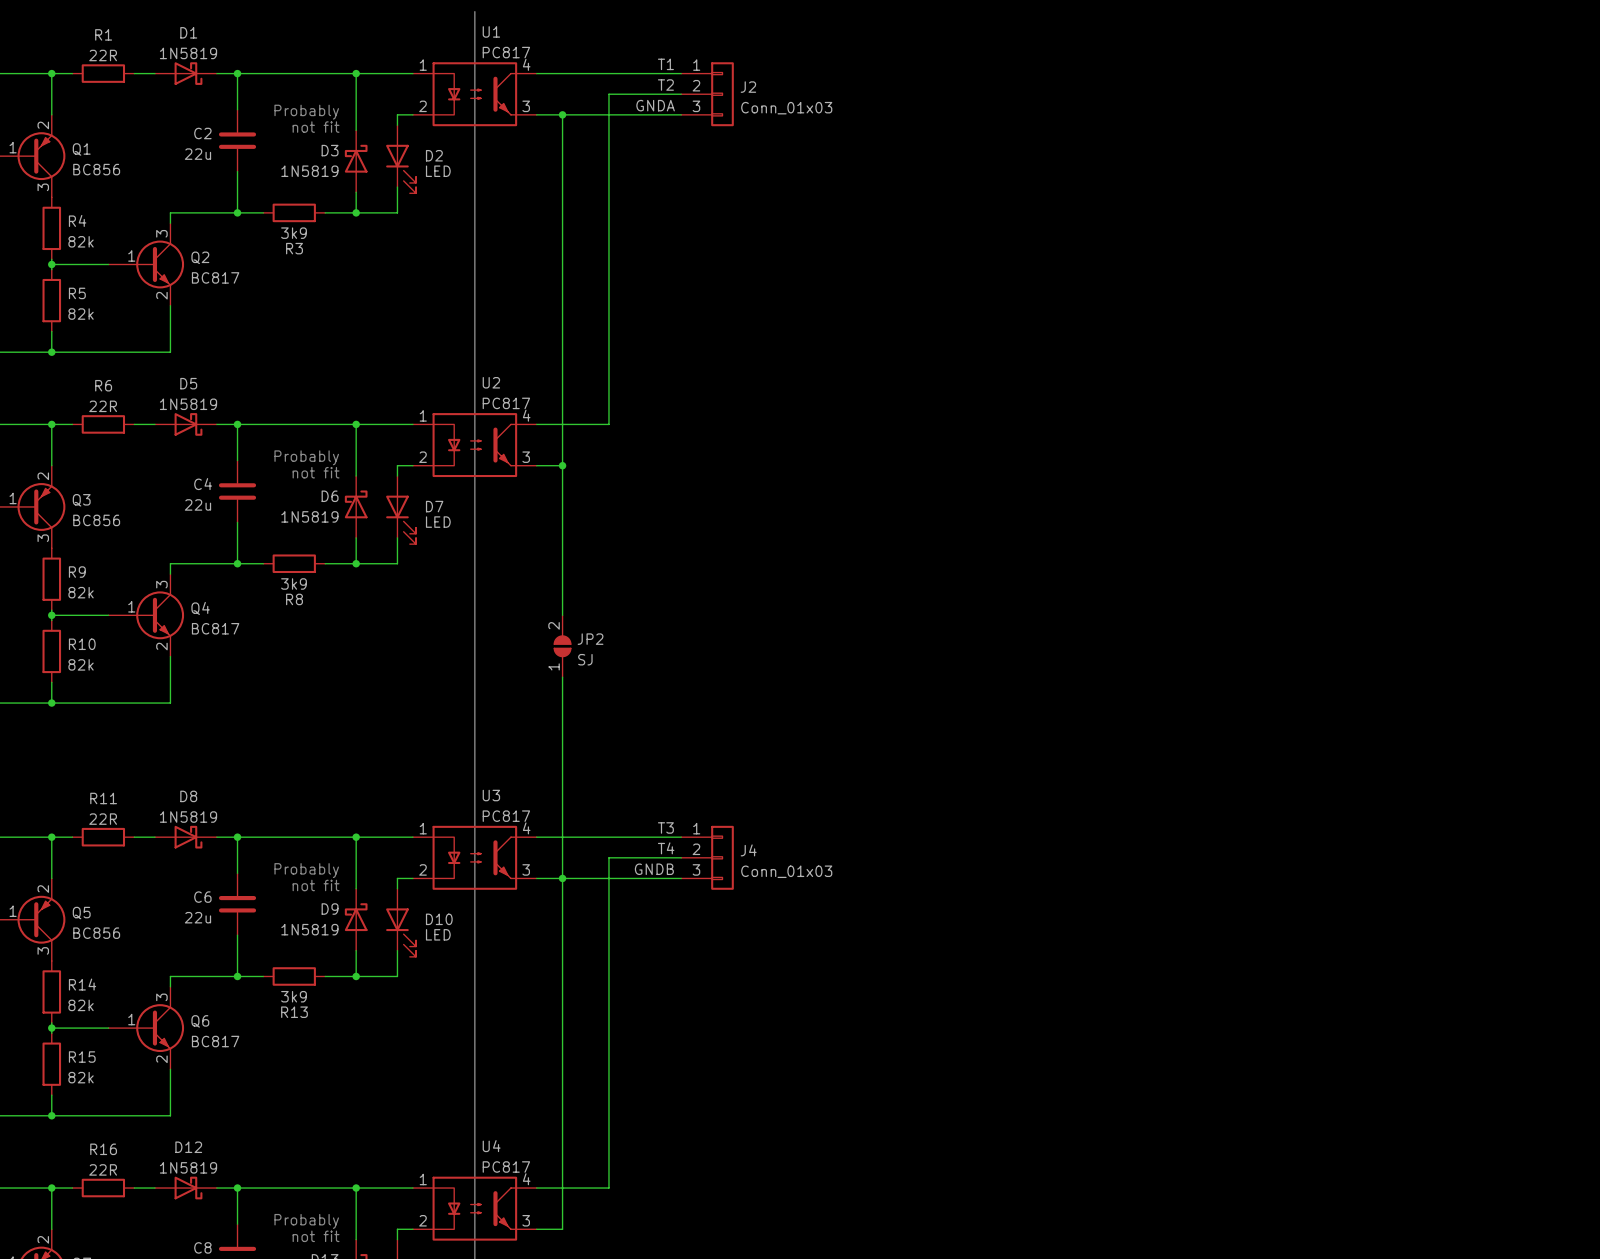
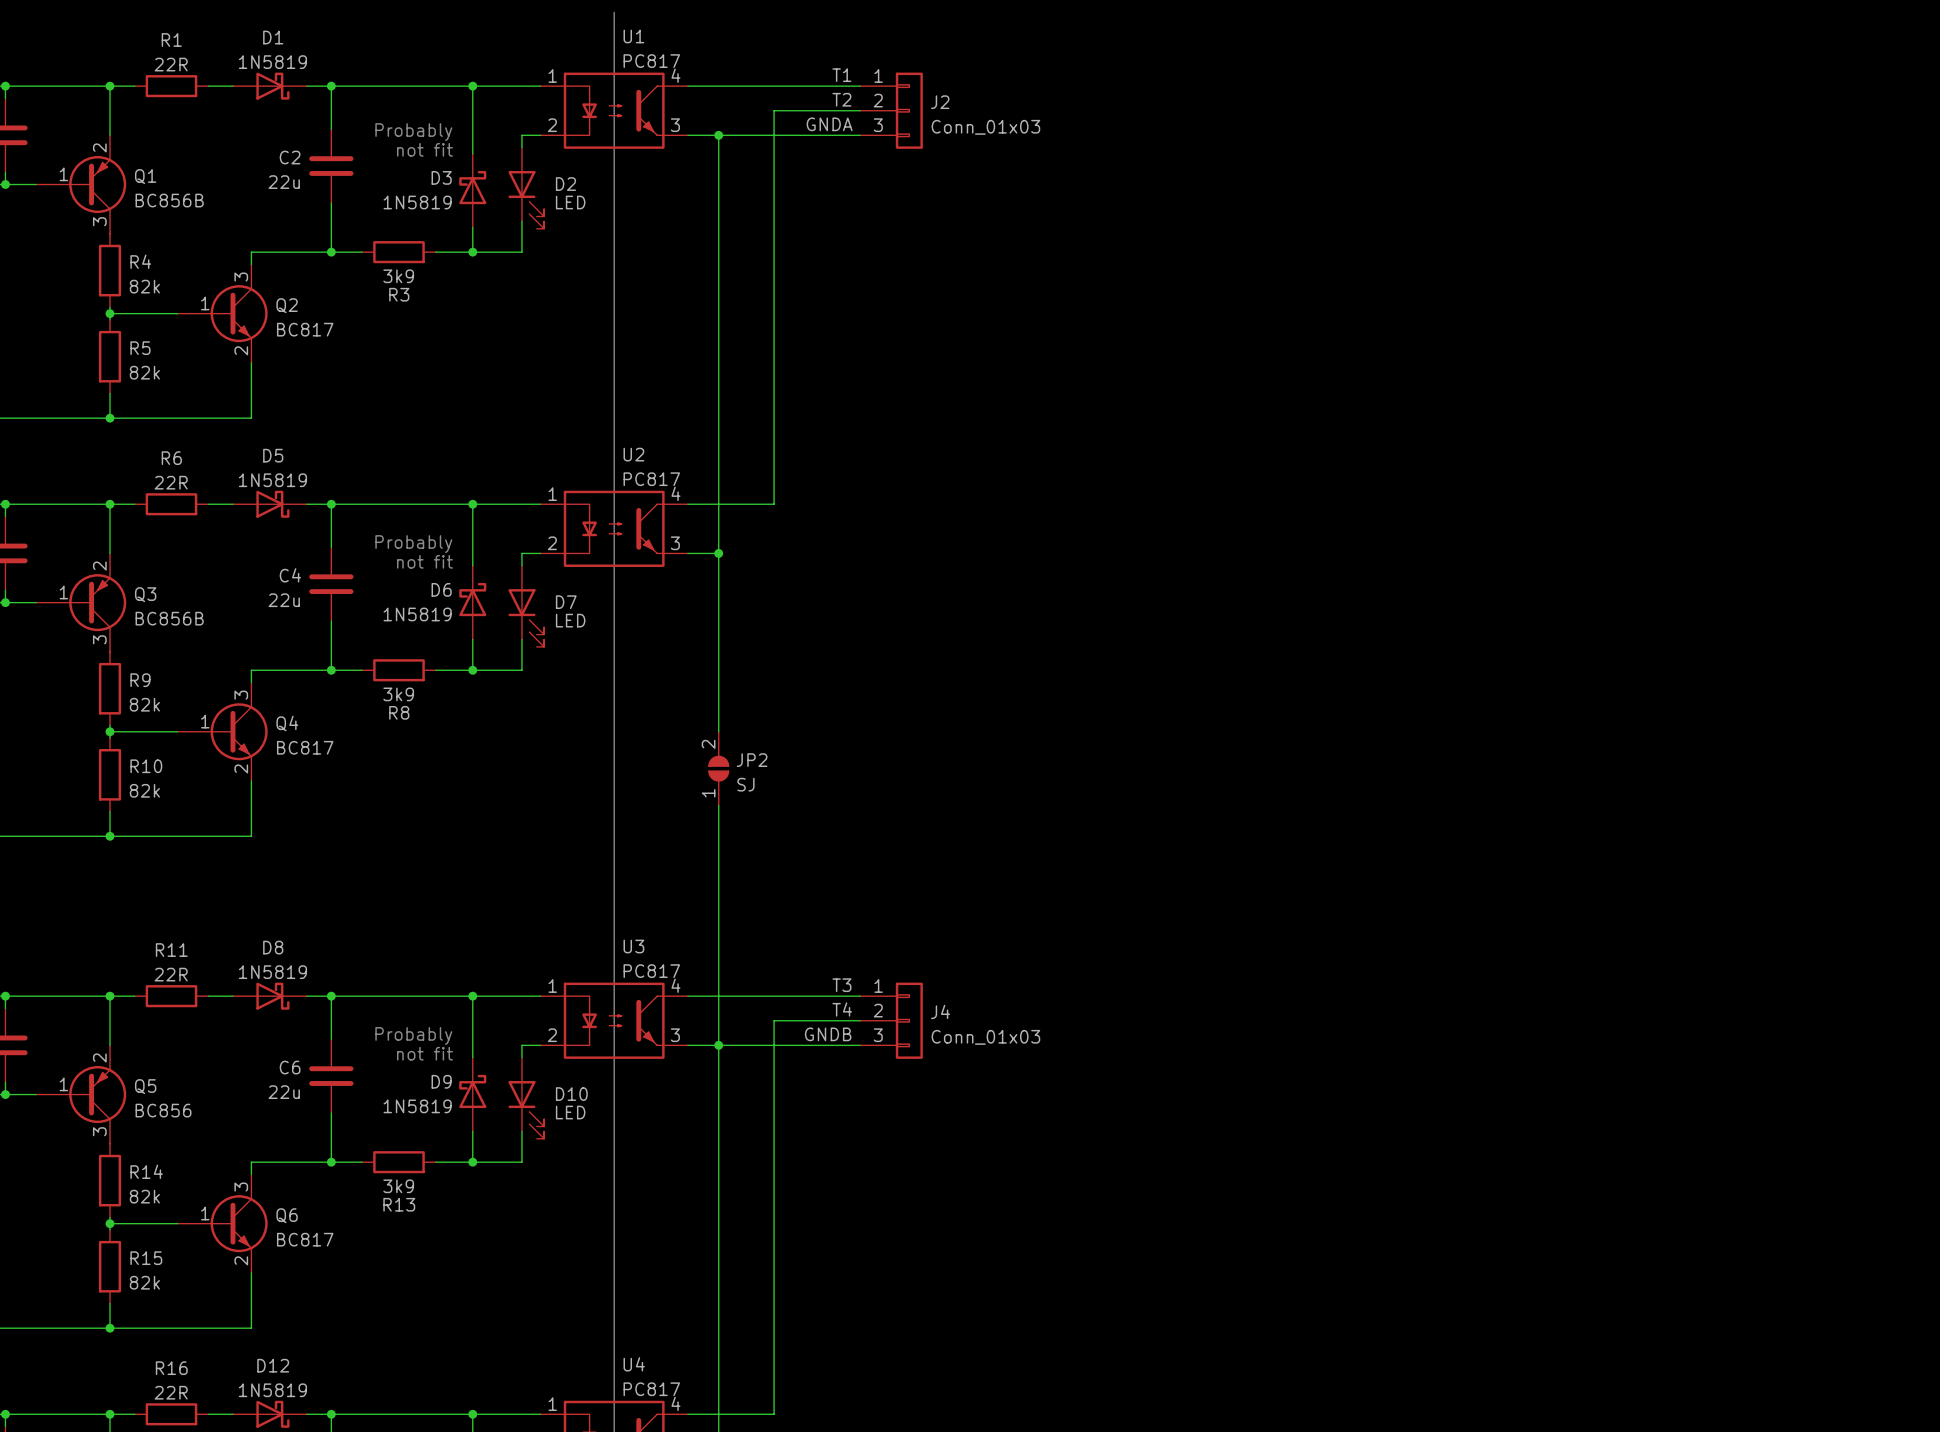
Q1 value: BC856 (96, 169) -> BC856B (169, 200)
Q3 value: BC856 (96, 520) -> BC856B (169, 618)

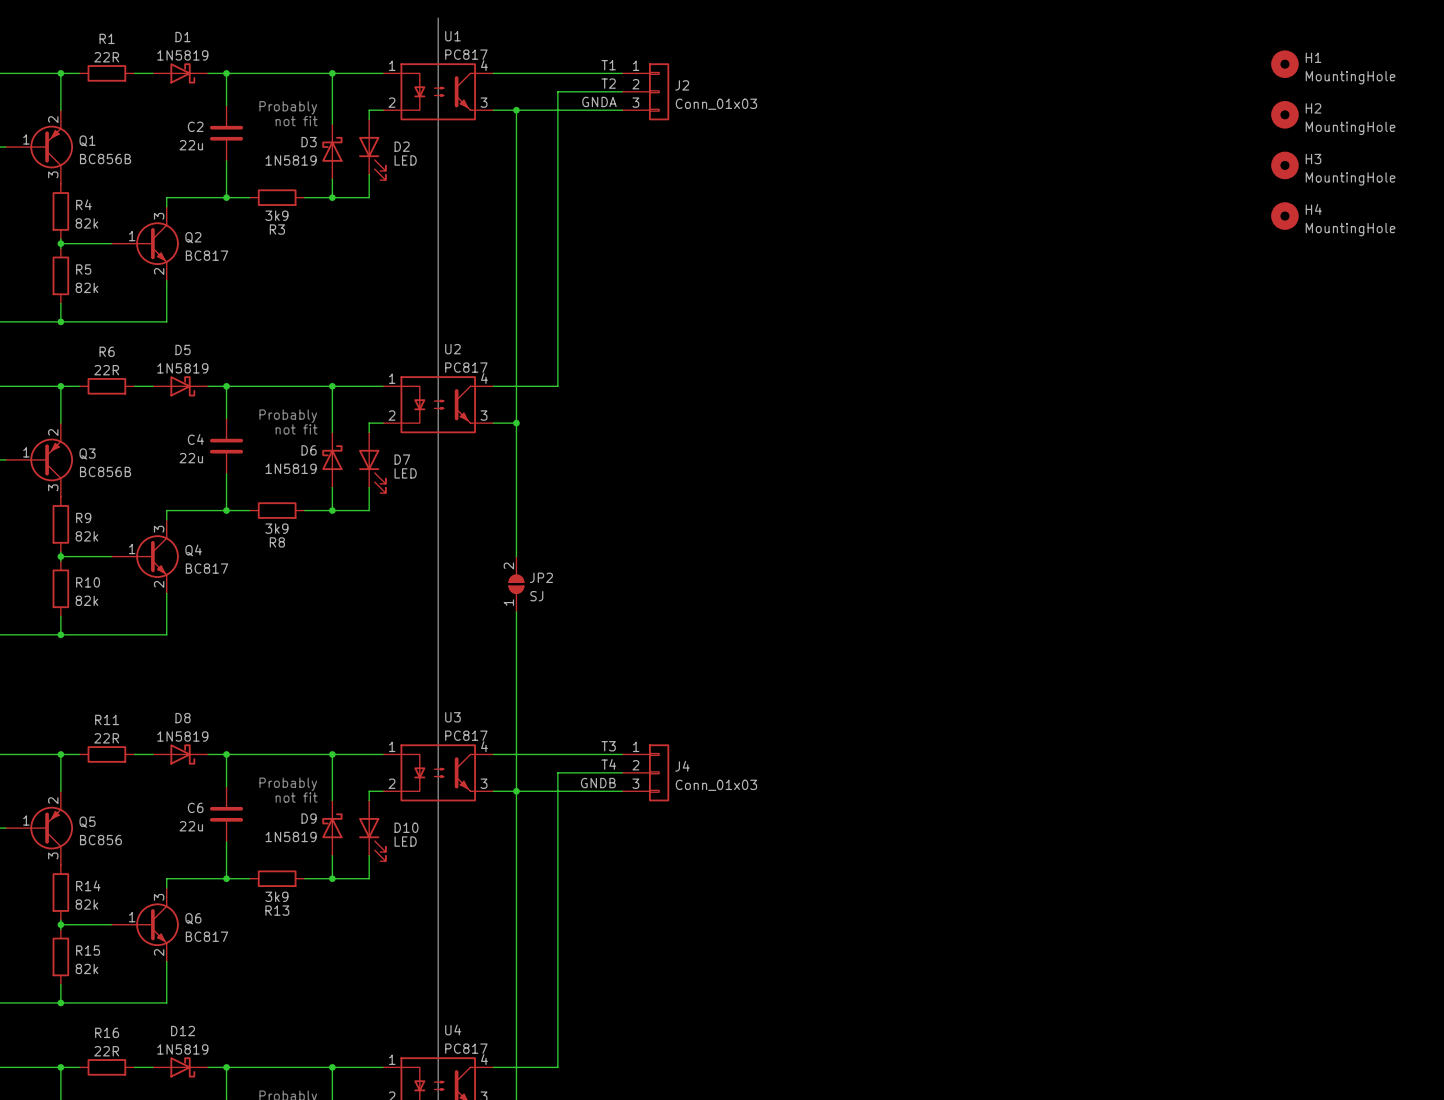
H1: none -> MountingHole (1284, 64)
H2: none -> MountingHole (1284, 114)
H3: none -> MountingHole (1284, 165)
H4: none -> MountingHole (1284, 216)

